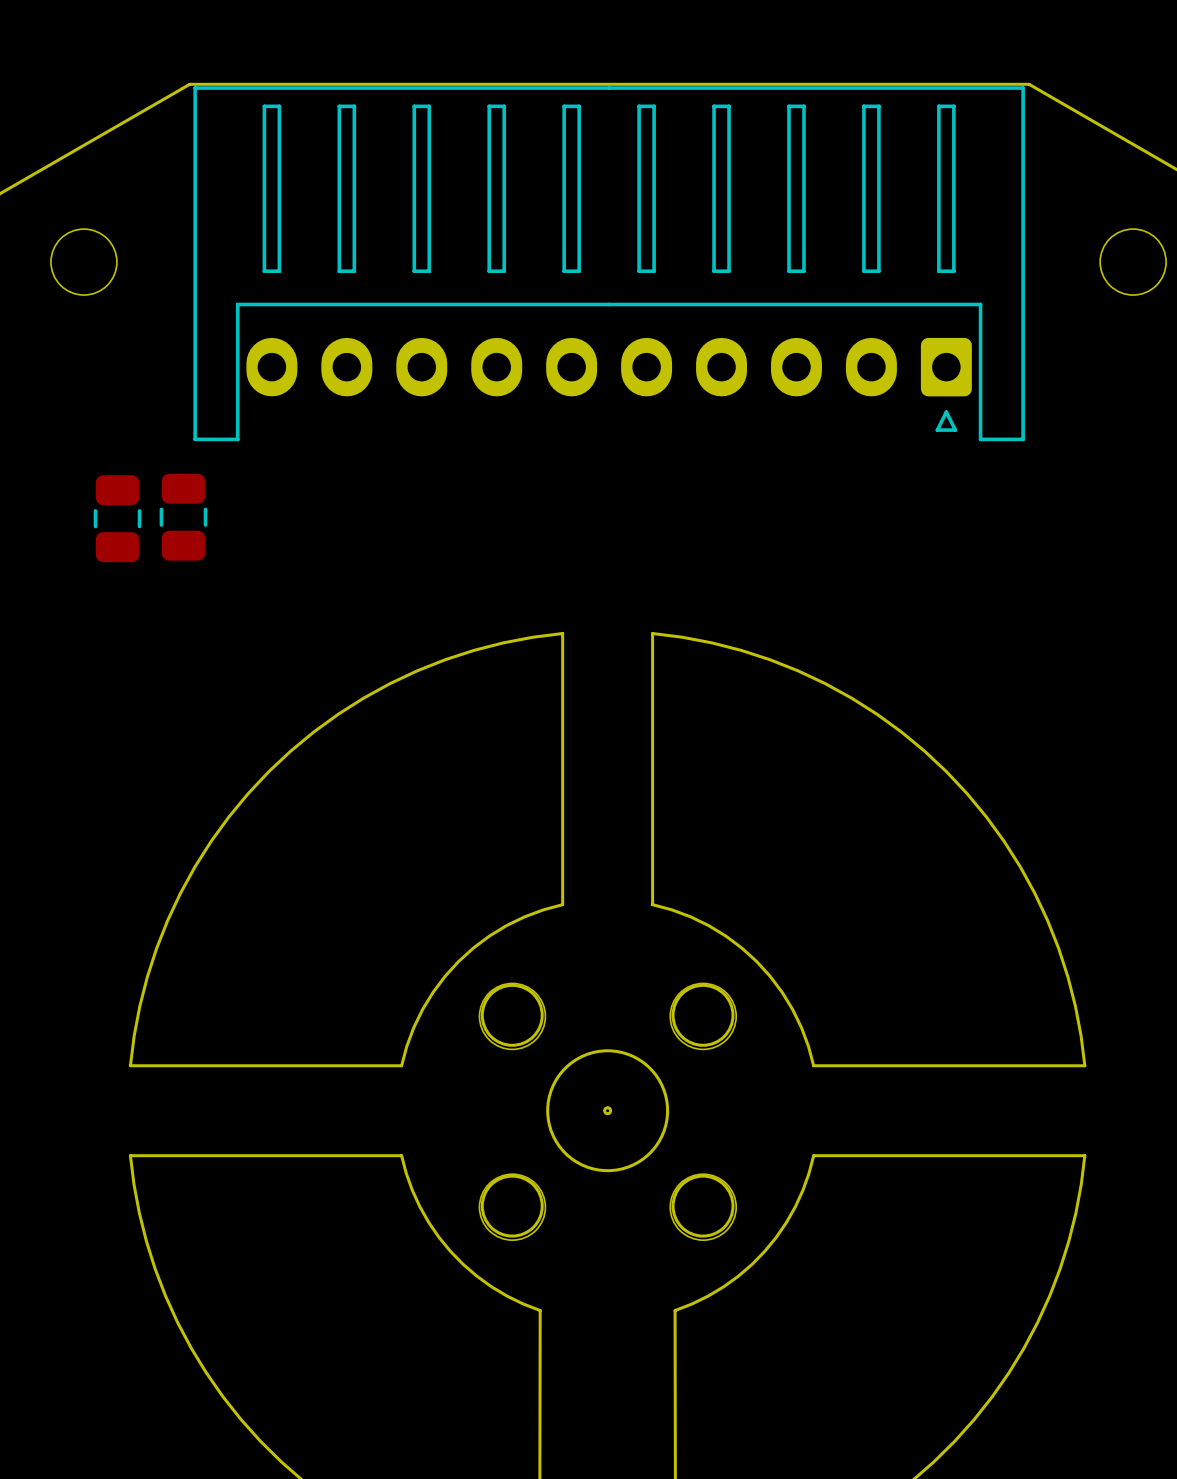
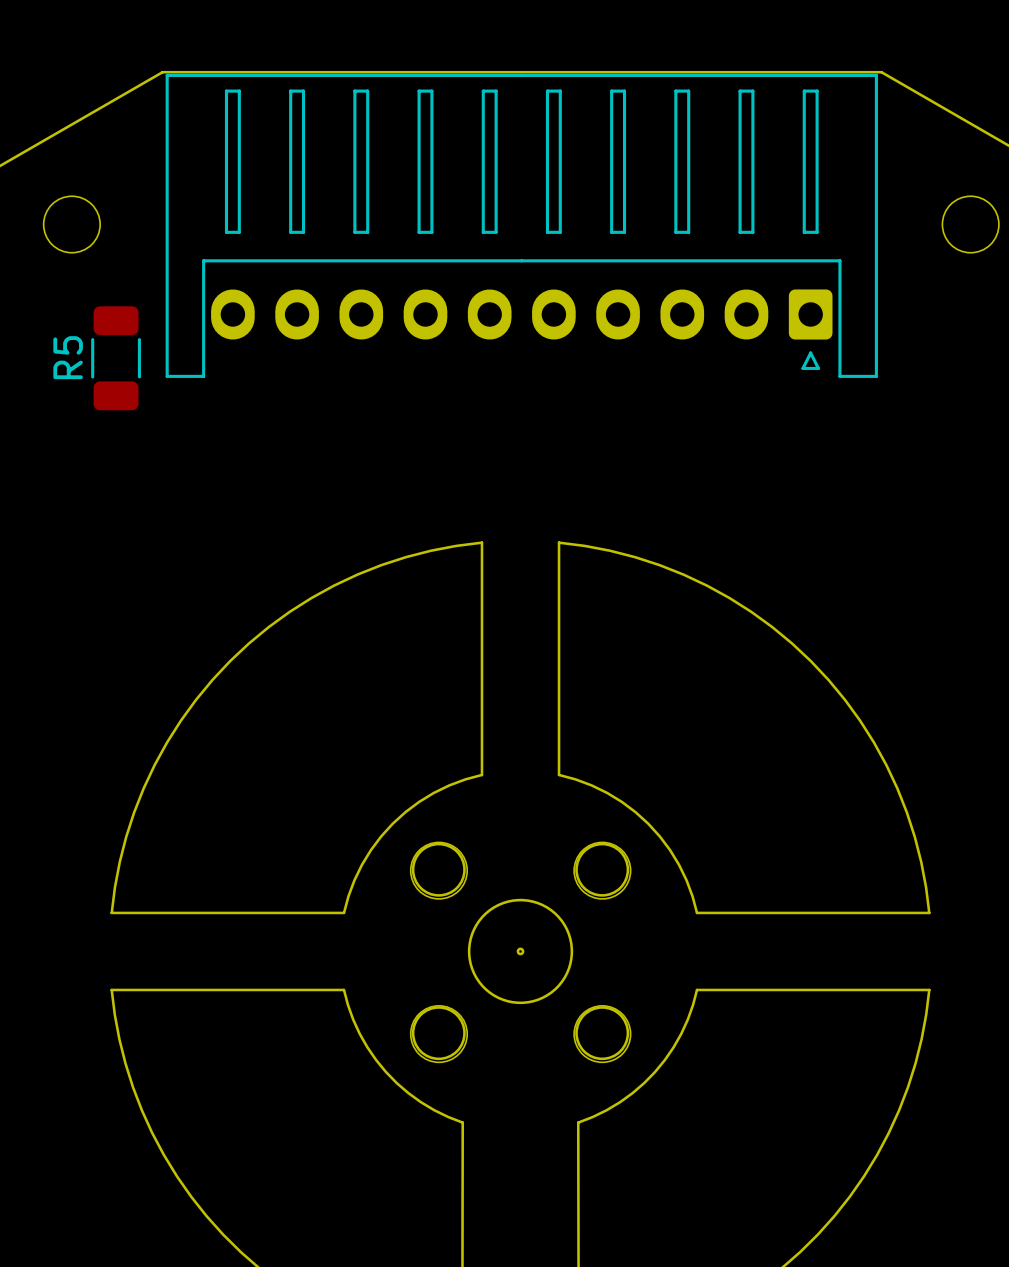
R5: none -> (116, 358)
part: (183, 517) -> none
part: (117, 518) -> none

